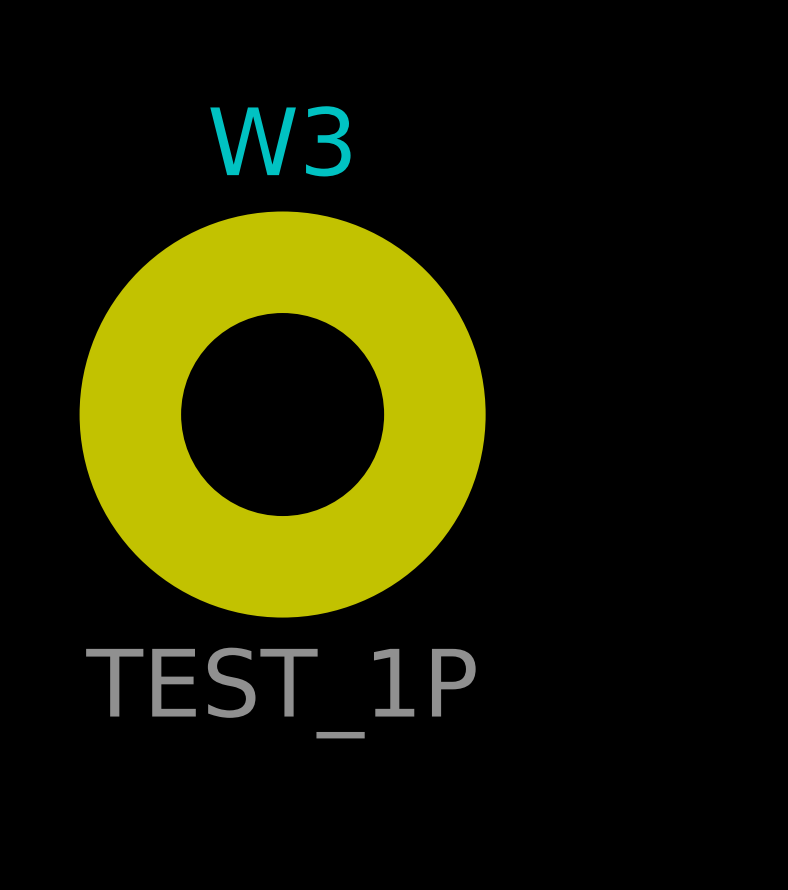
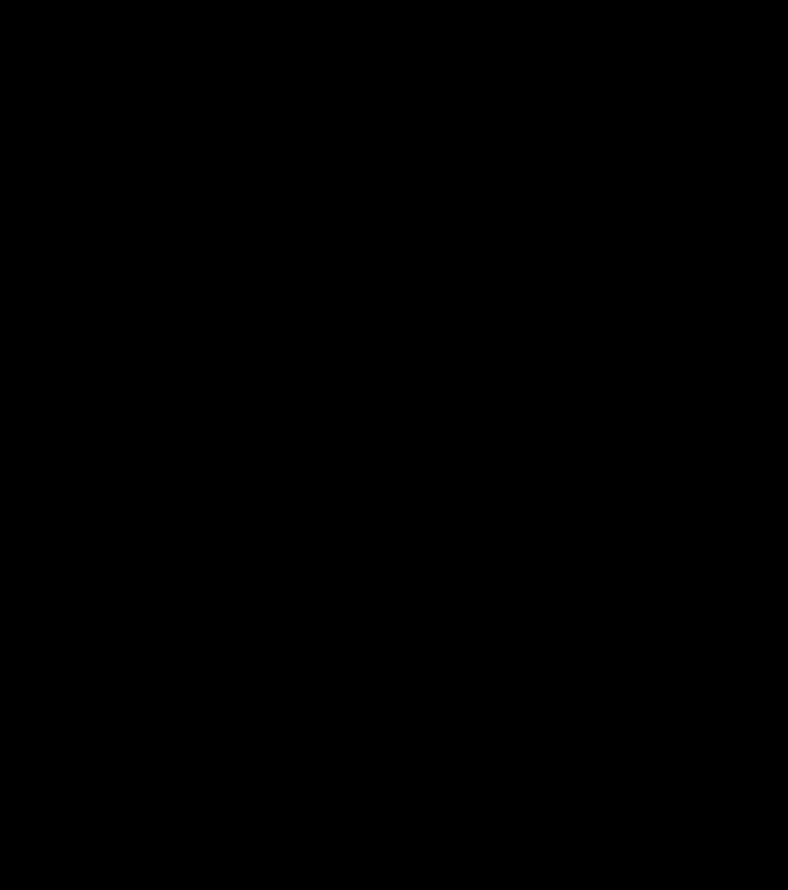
W3: TEST_1P (282, 414) -> none

